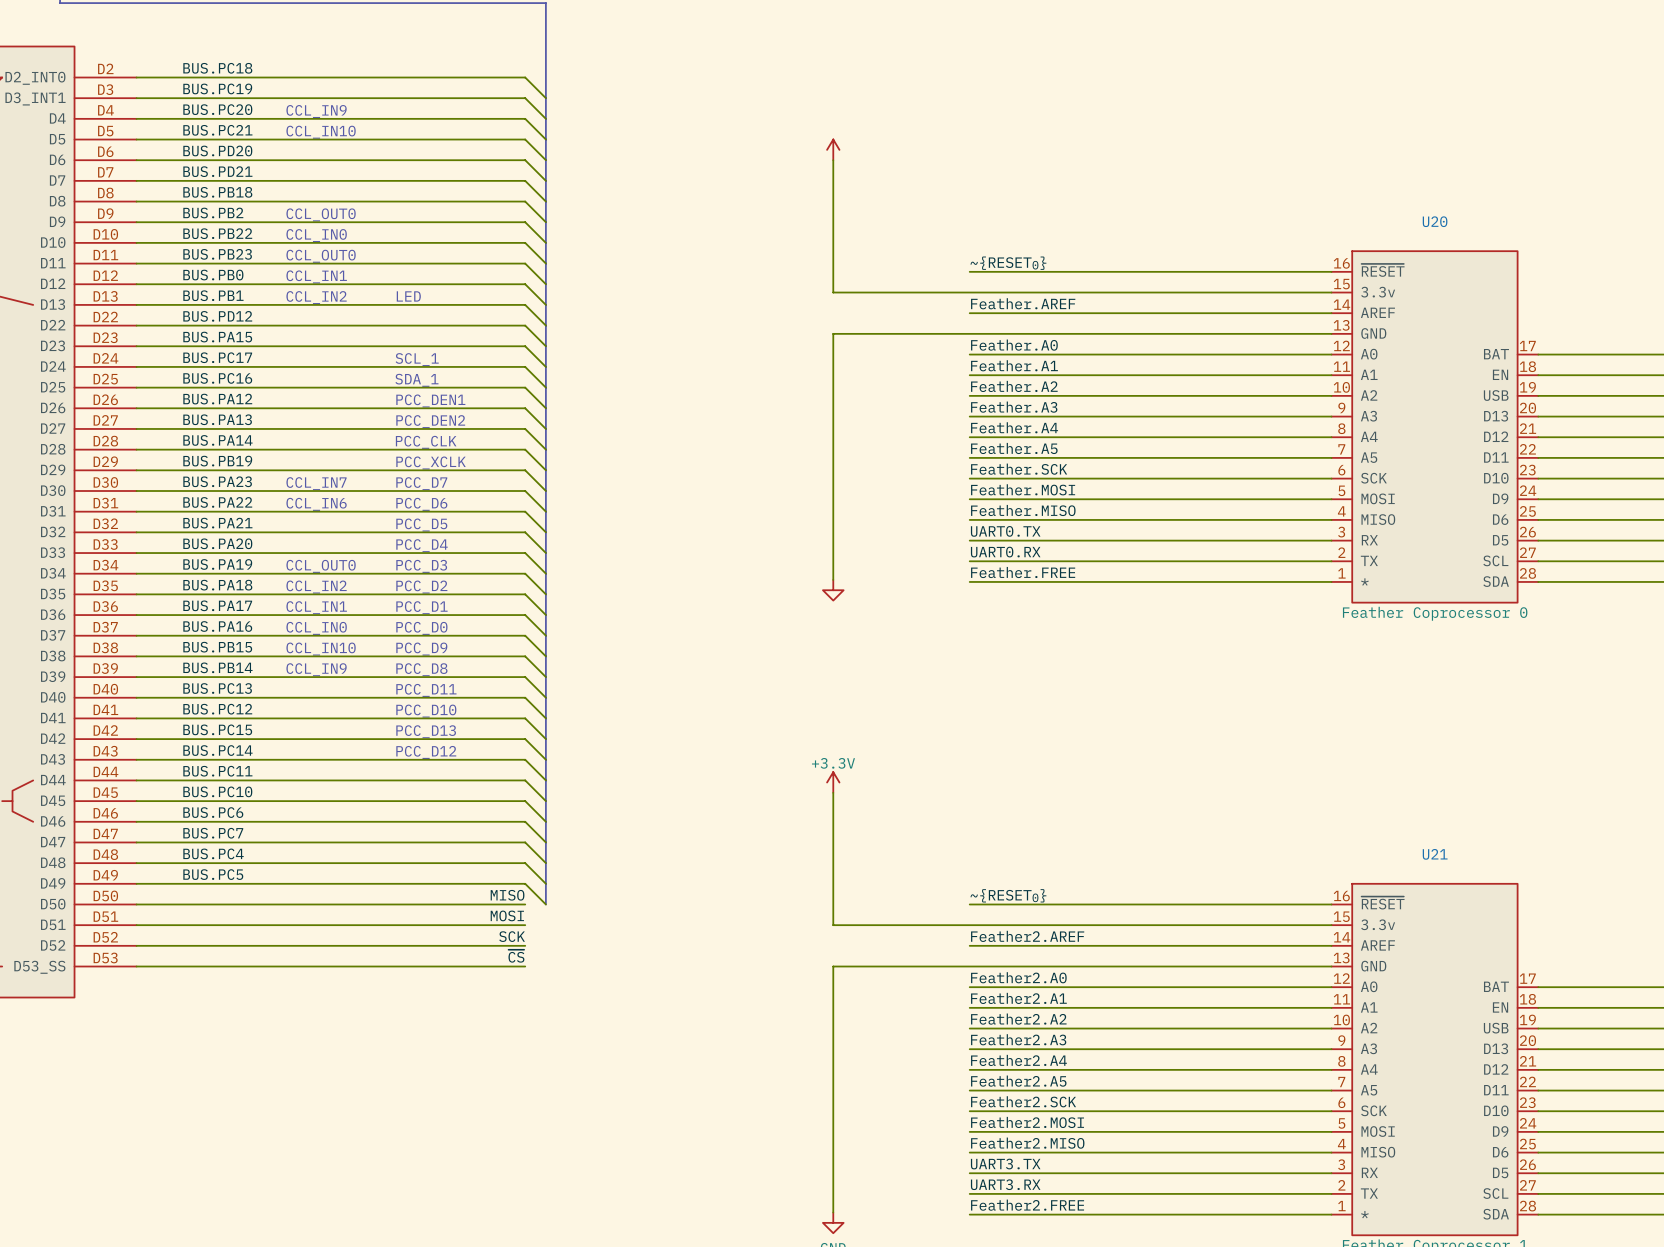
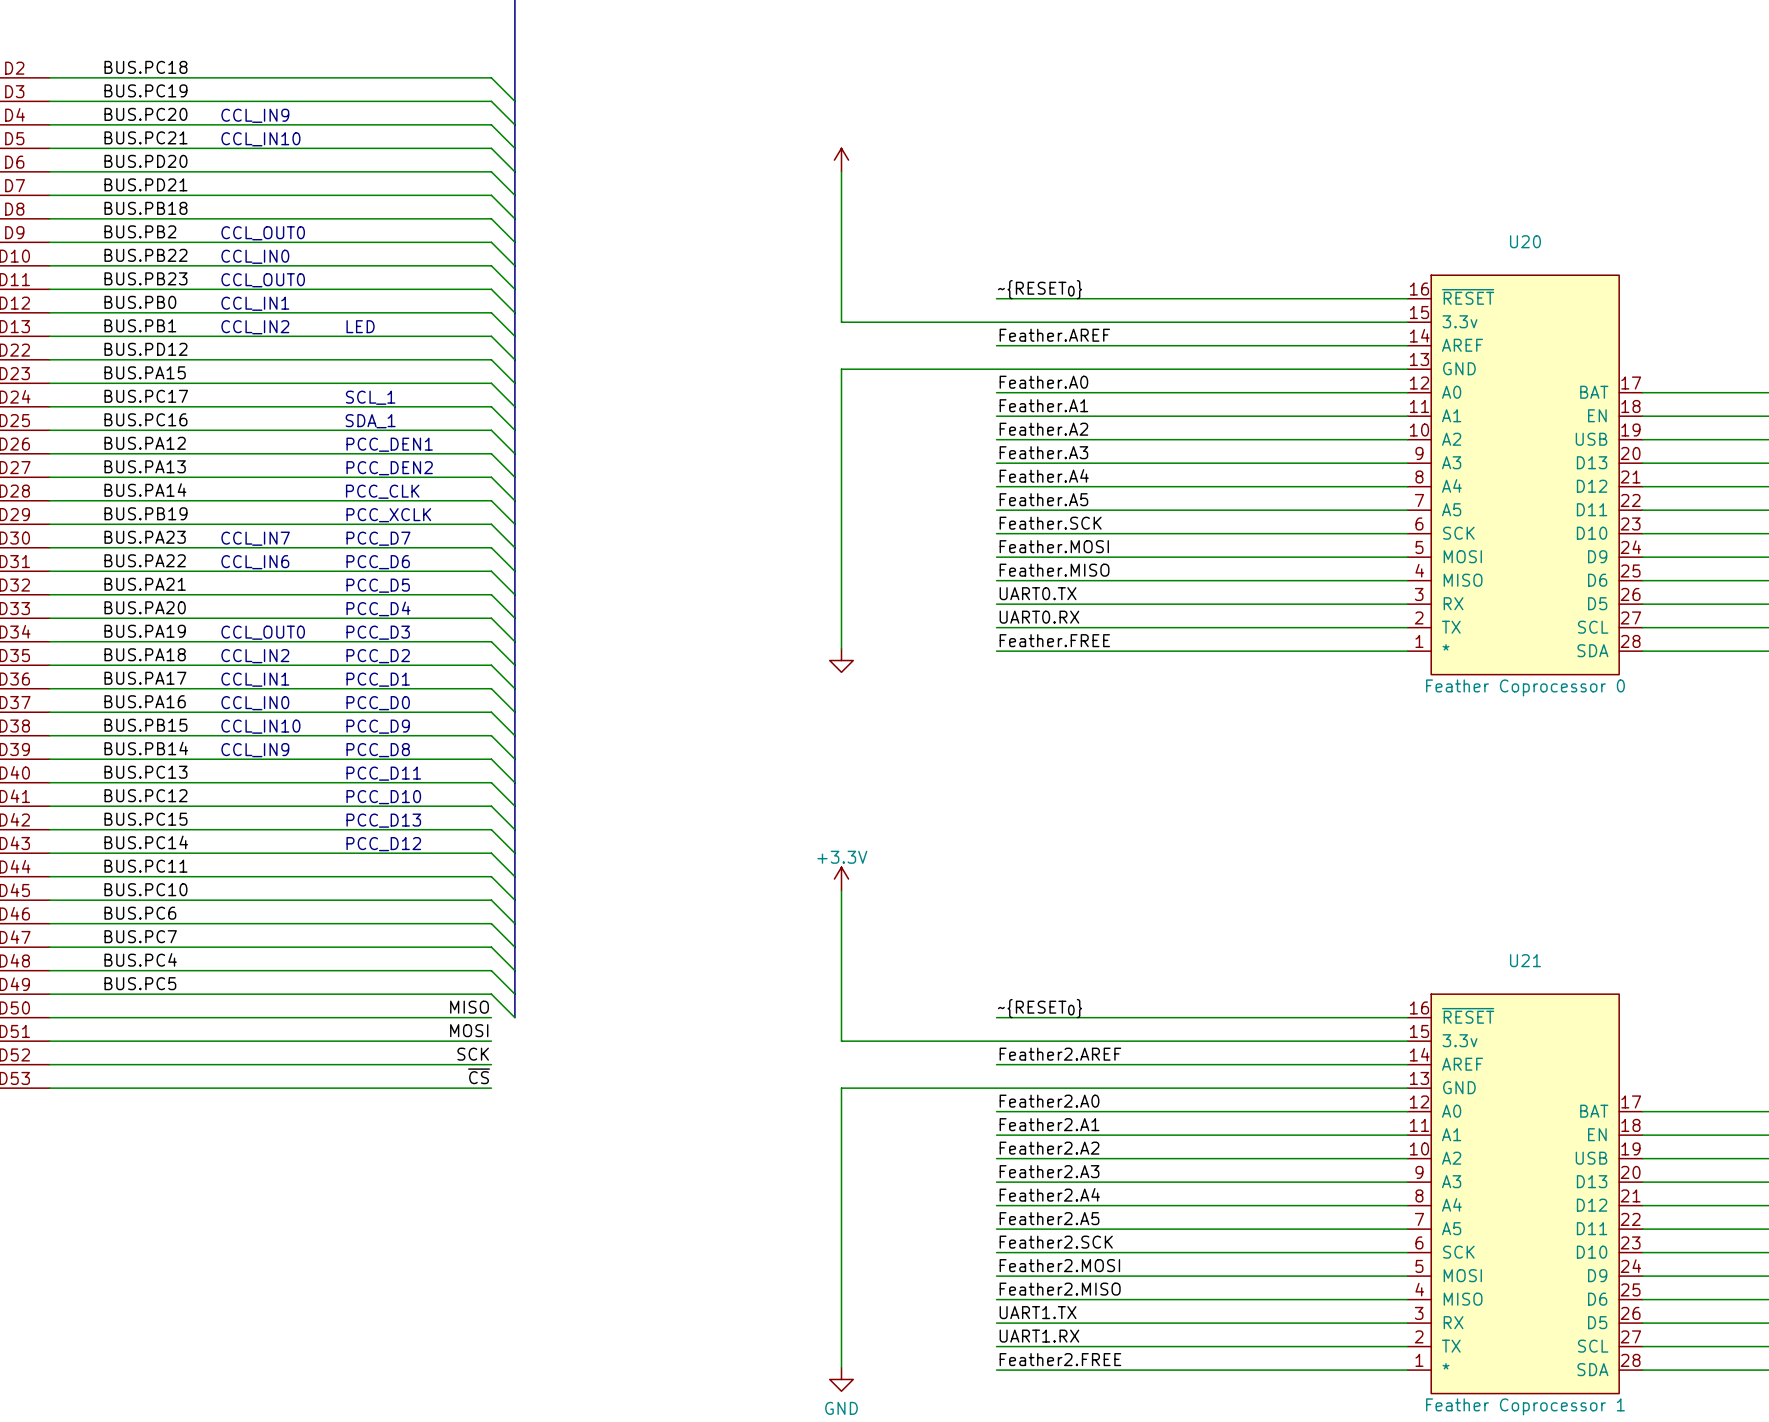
label: UART3.TX (1005, 1164) -> UART1.TX (1038, 1312)
label: UART3.RX (1005, 1184) -> UART1.RX (1039, 1336)

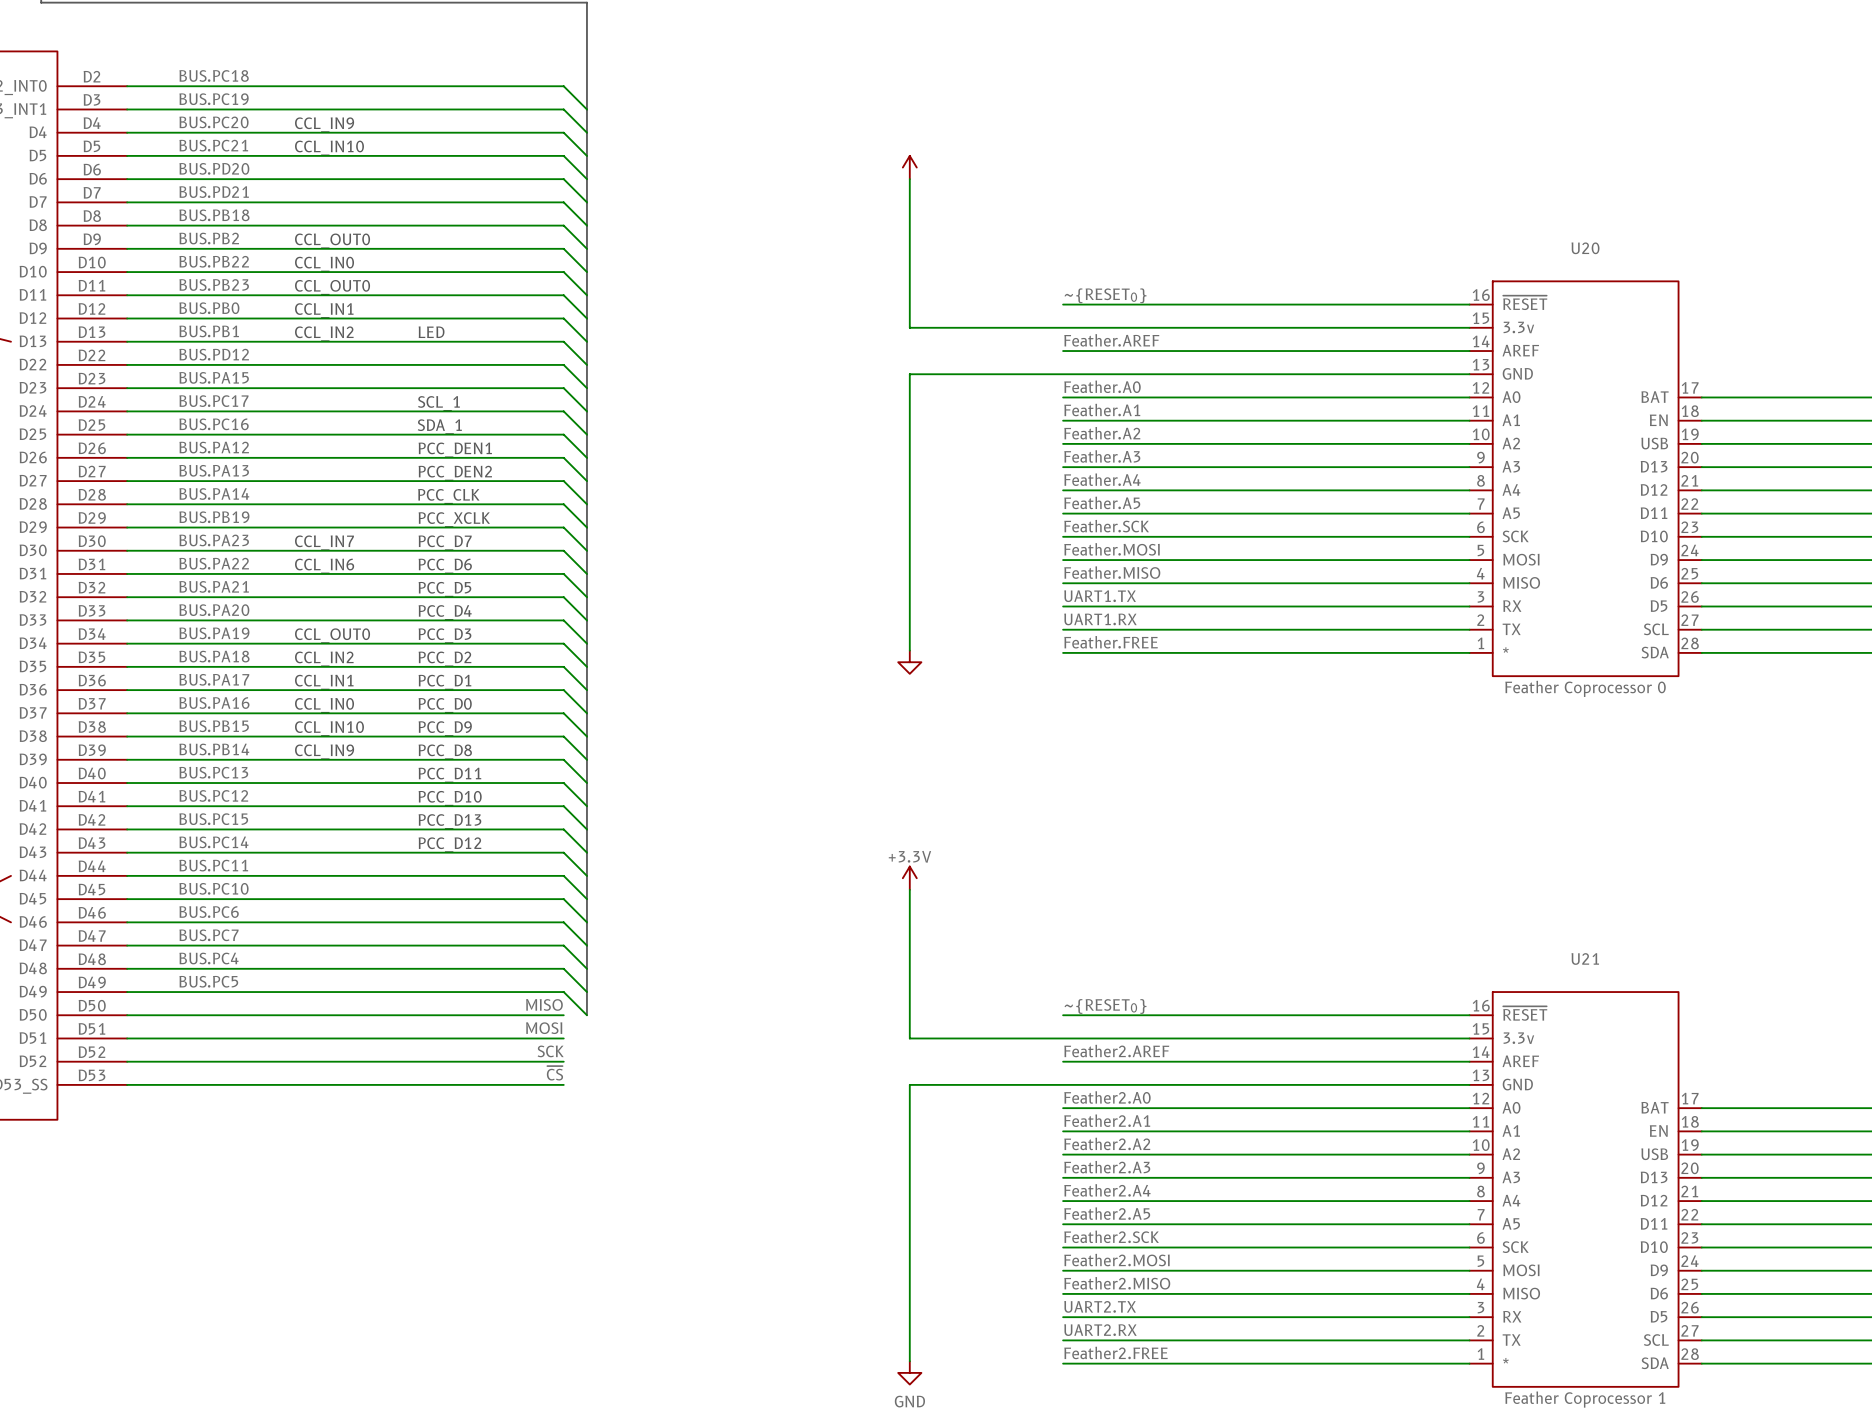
label: UART0.TX (1038, 593) -> UART1.TX (1100, 596)
label: UART0.RX (1039, 617) -> UART1.RX (1100, 619)
label: UART1.TX (1038, 1312) -> UART2.TX (1100, 1306)
label: UART1.RX (1039, 1336) -> UART2.RX (1100, 1330)

